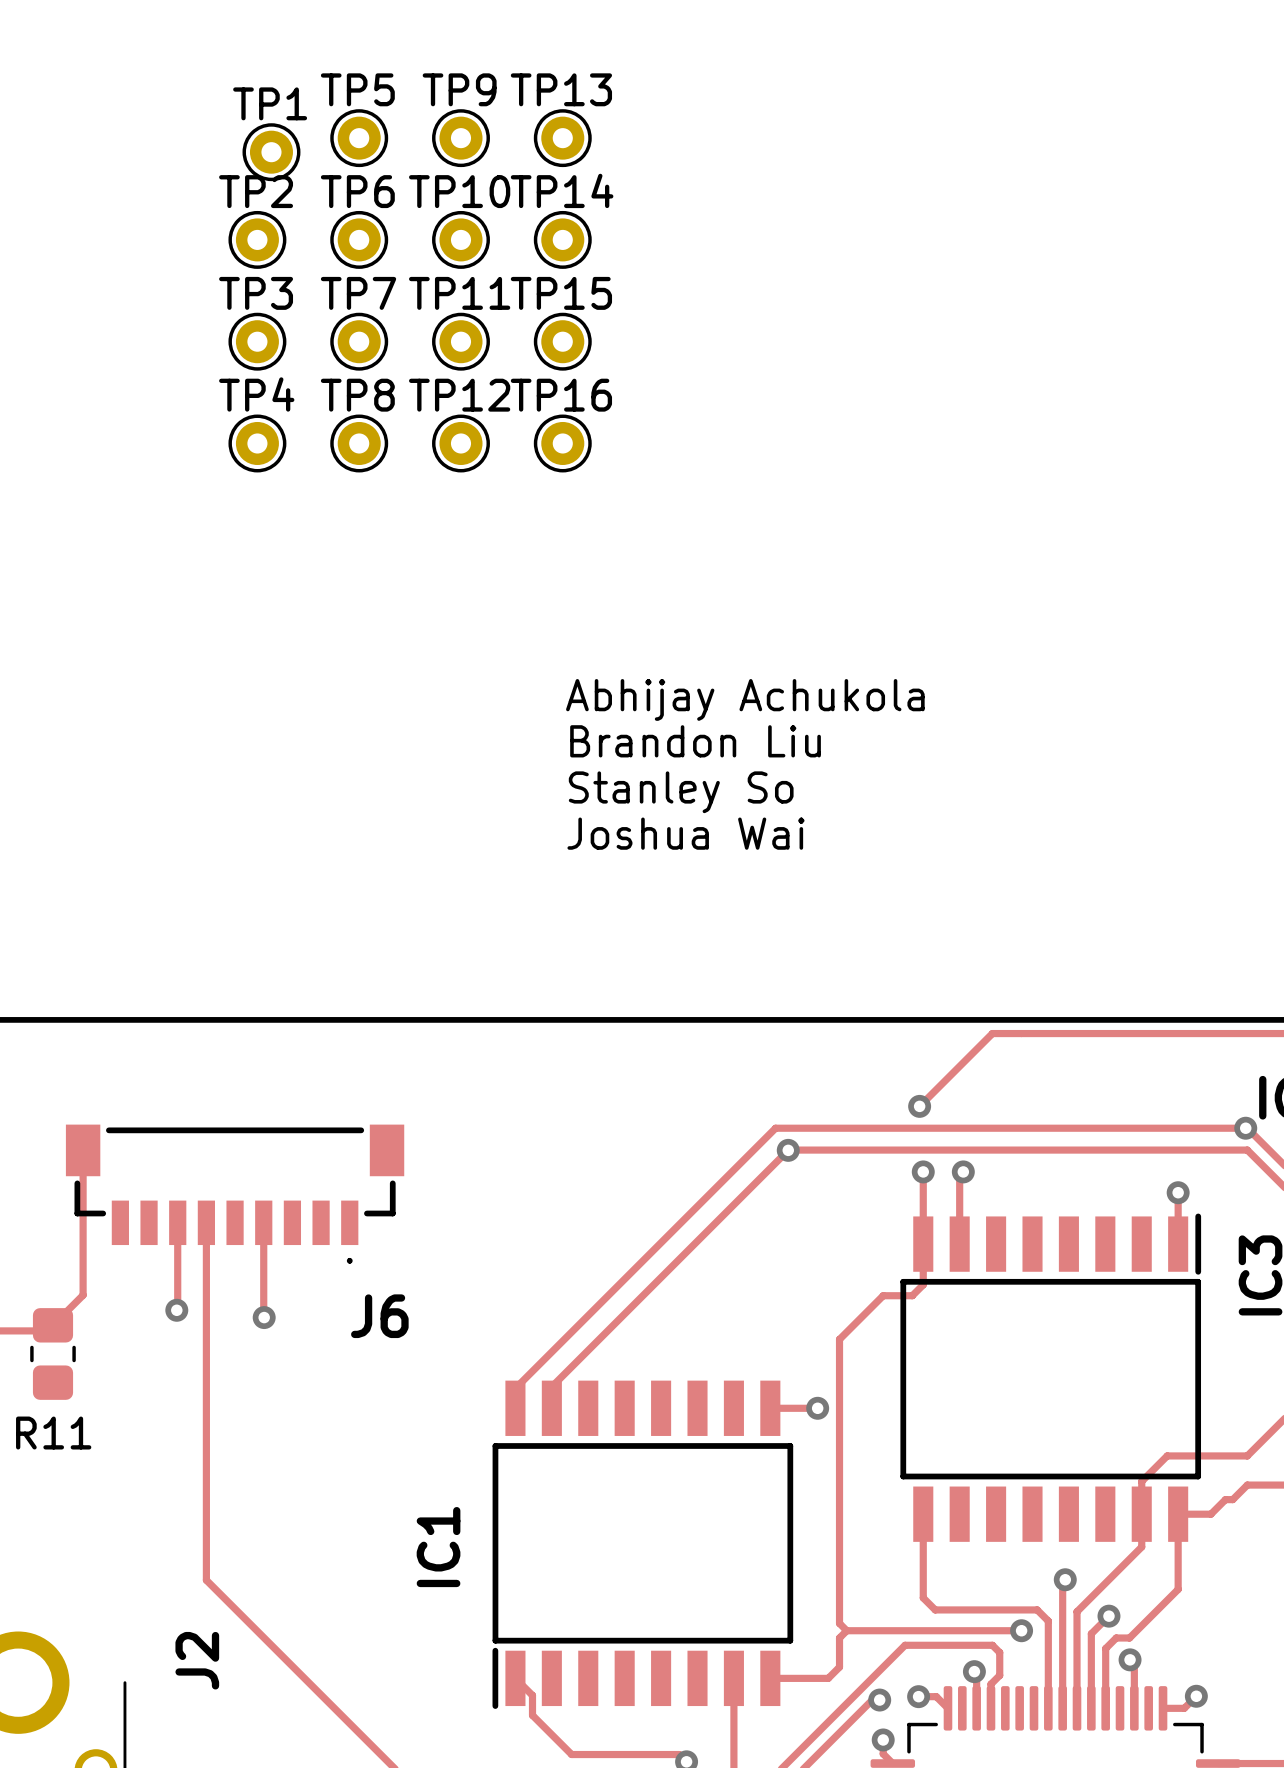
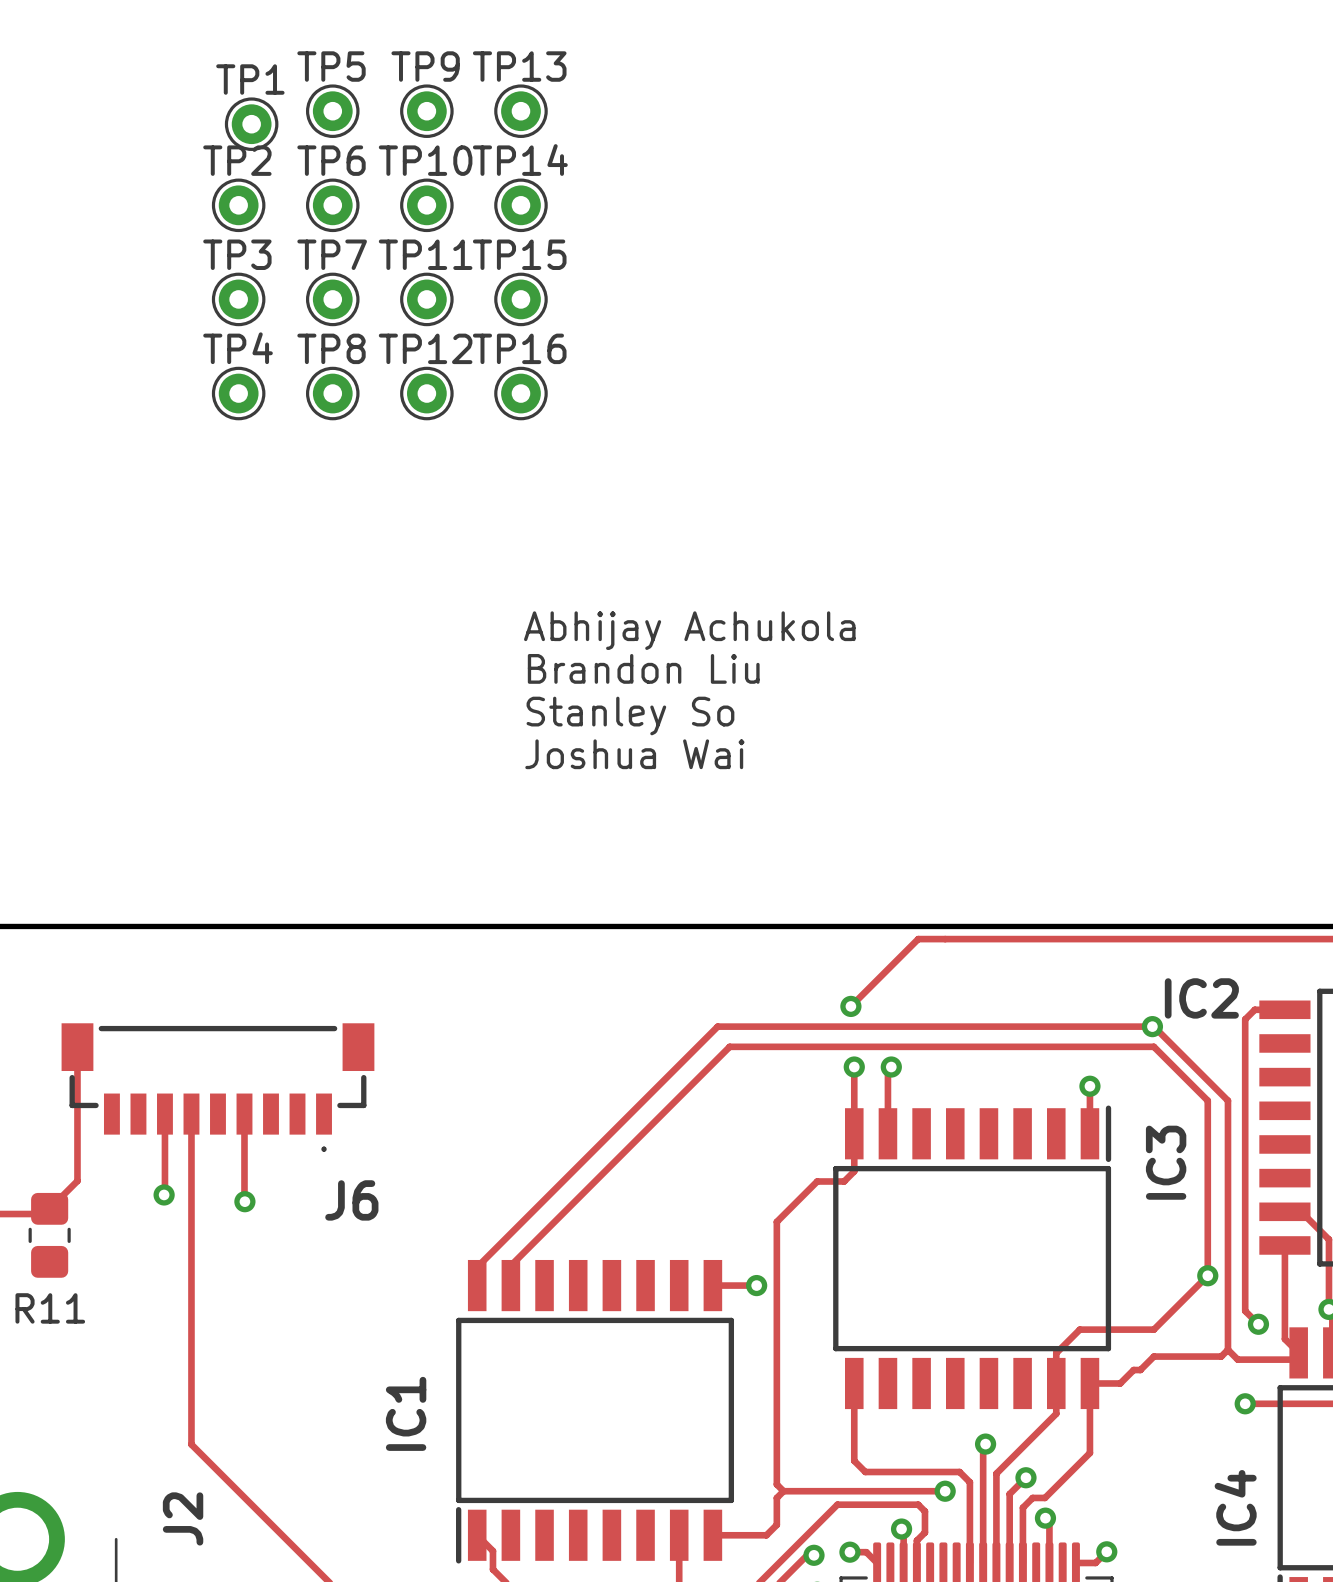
via: (788, 1150) -> none

